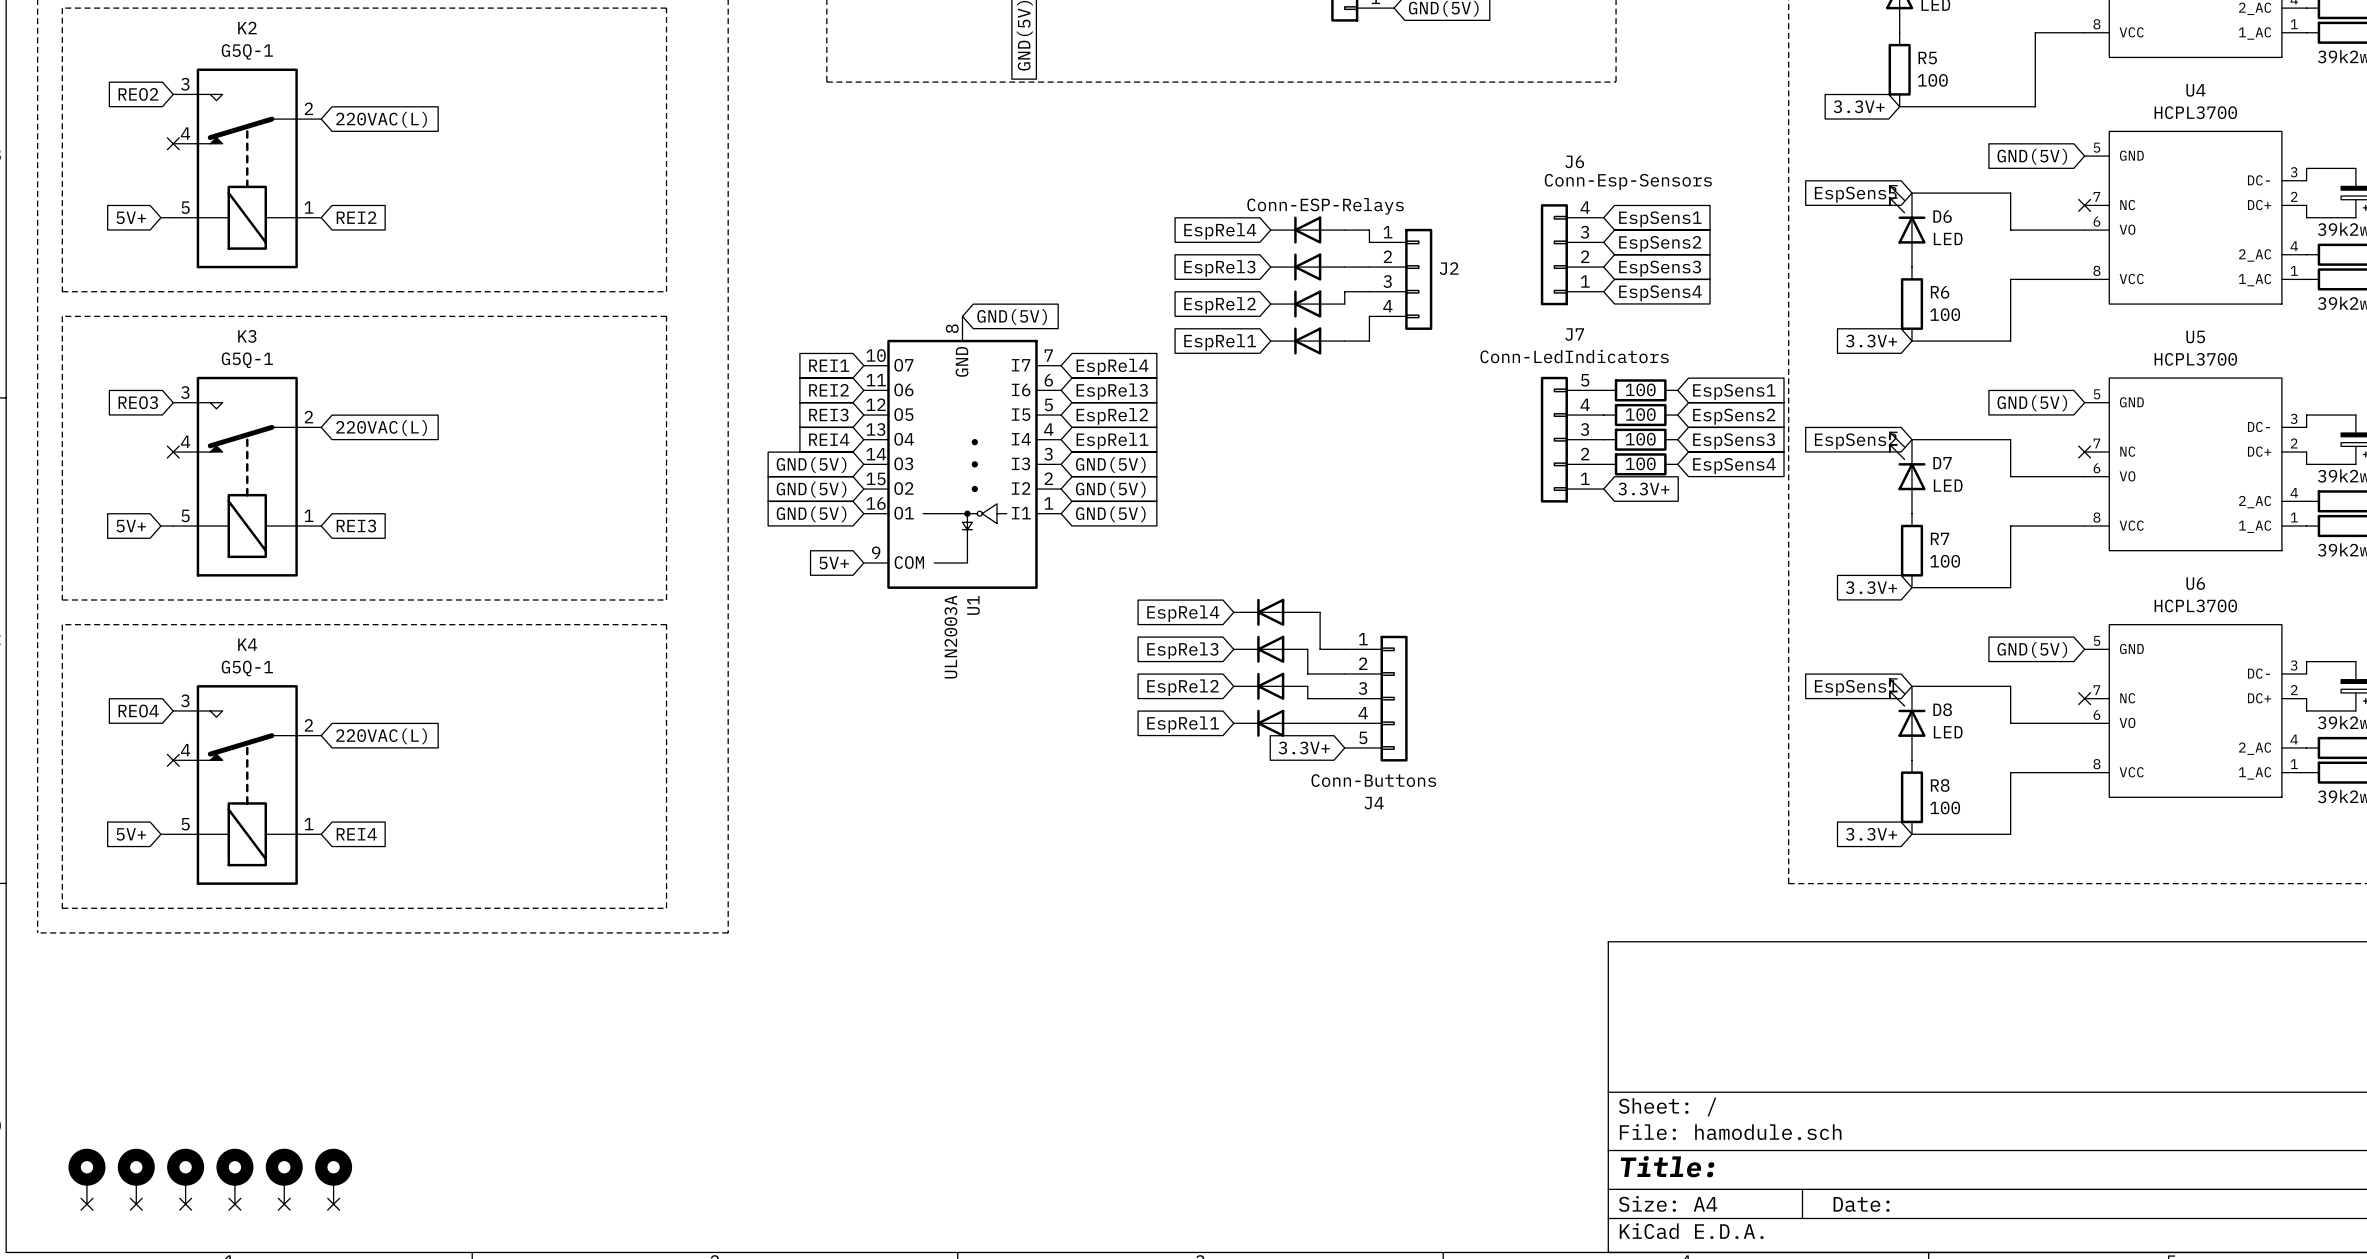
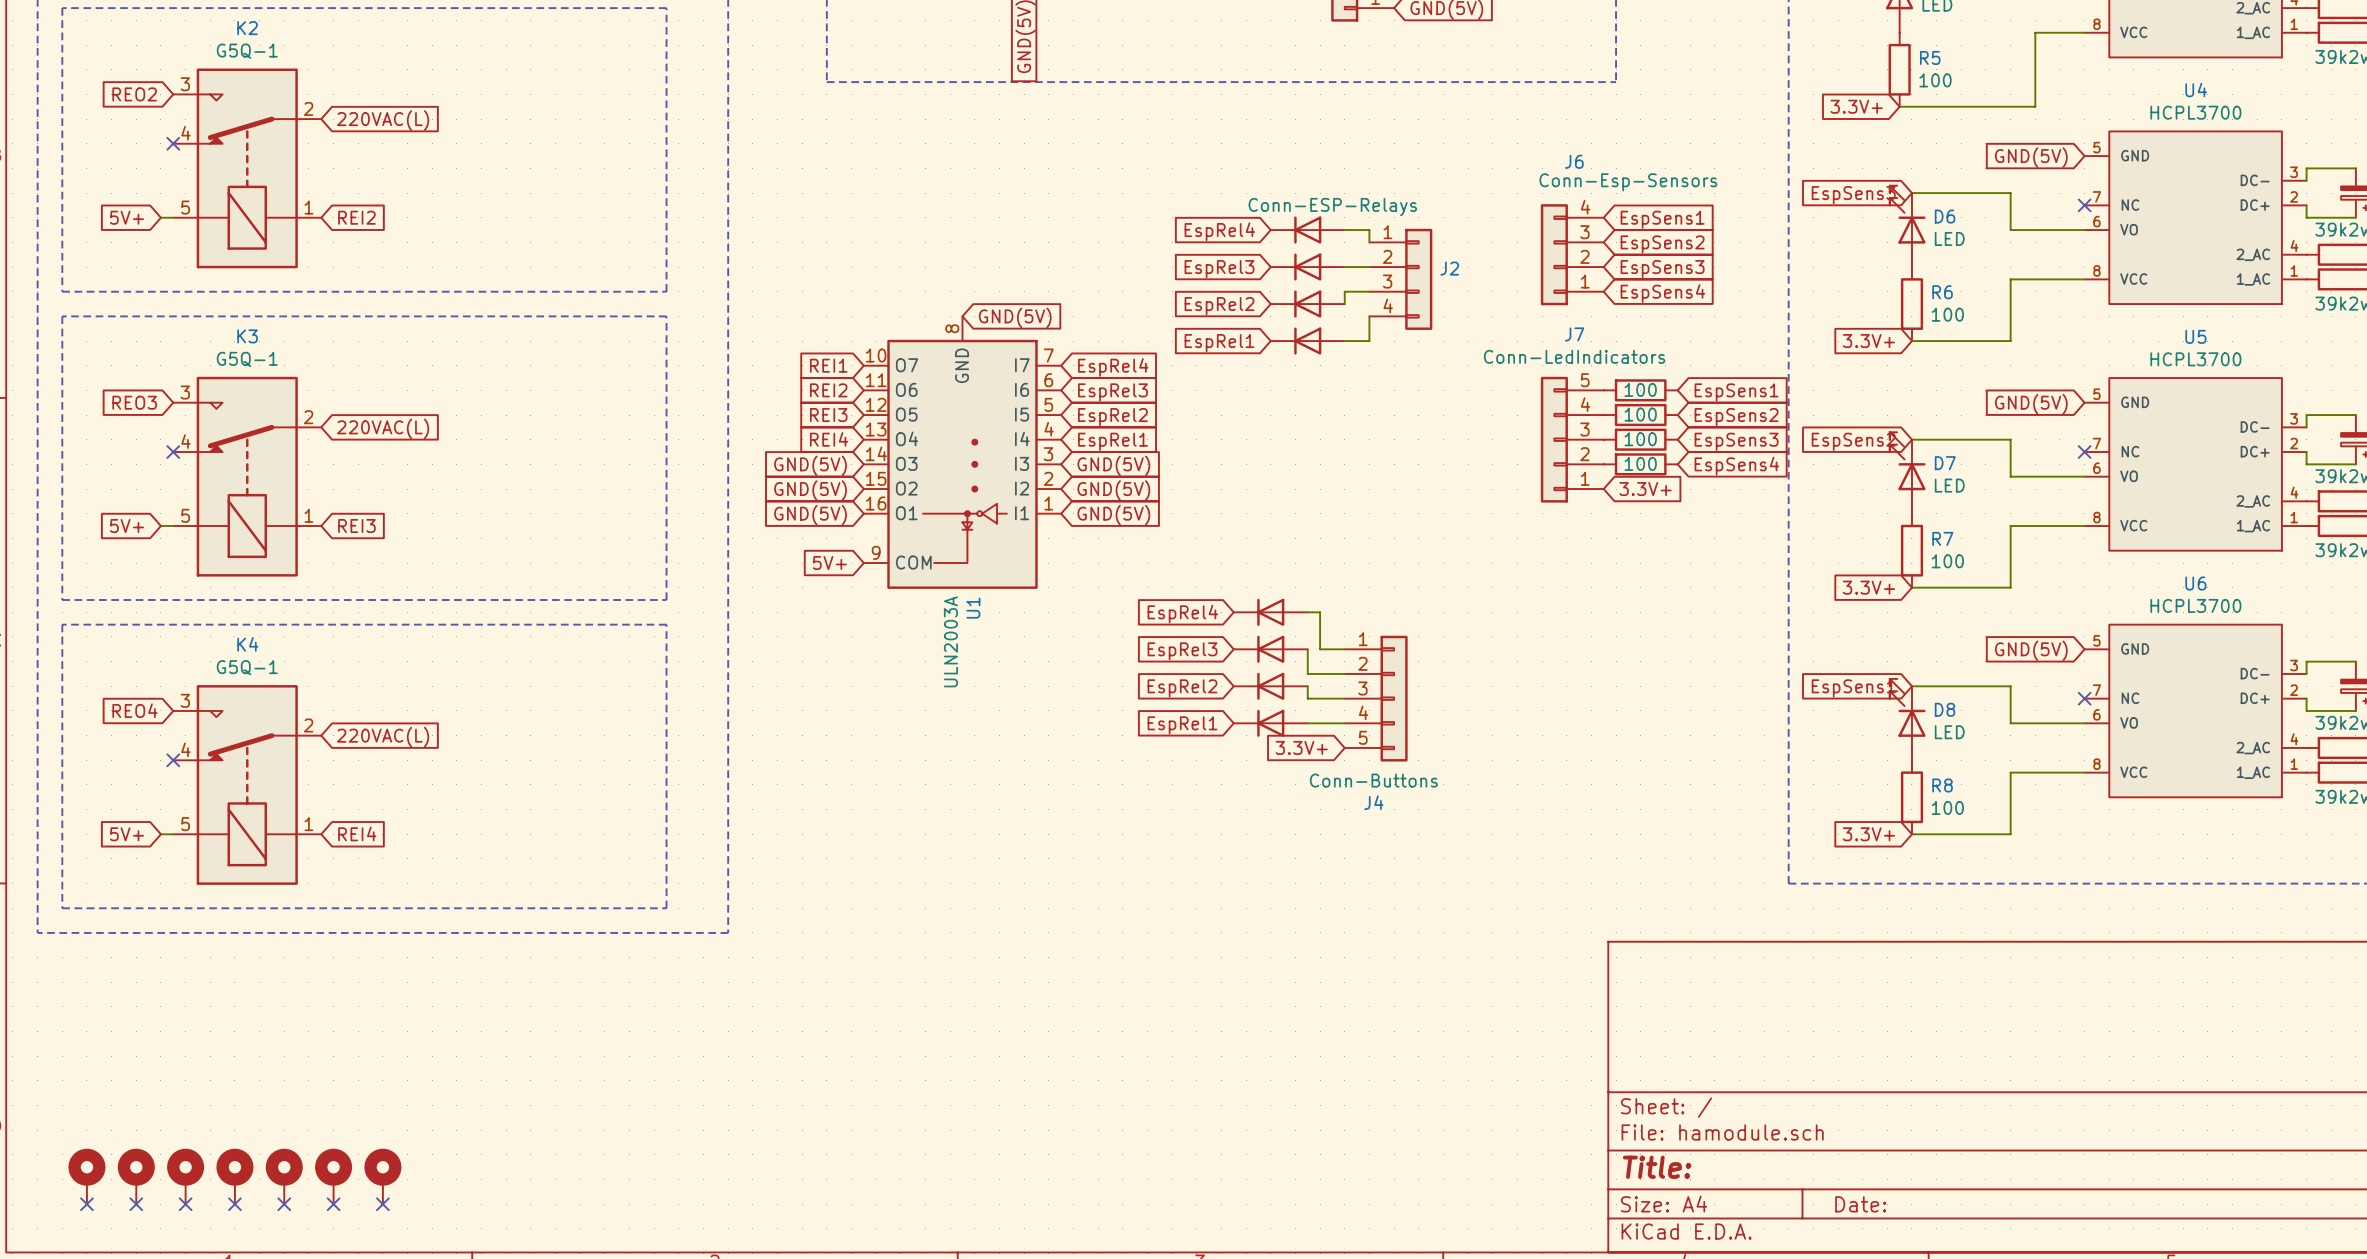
part: none -> (382, 1176)
no-connect mark: none -> (382, 1204)

